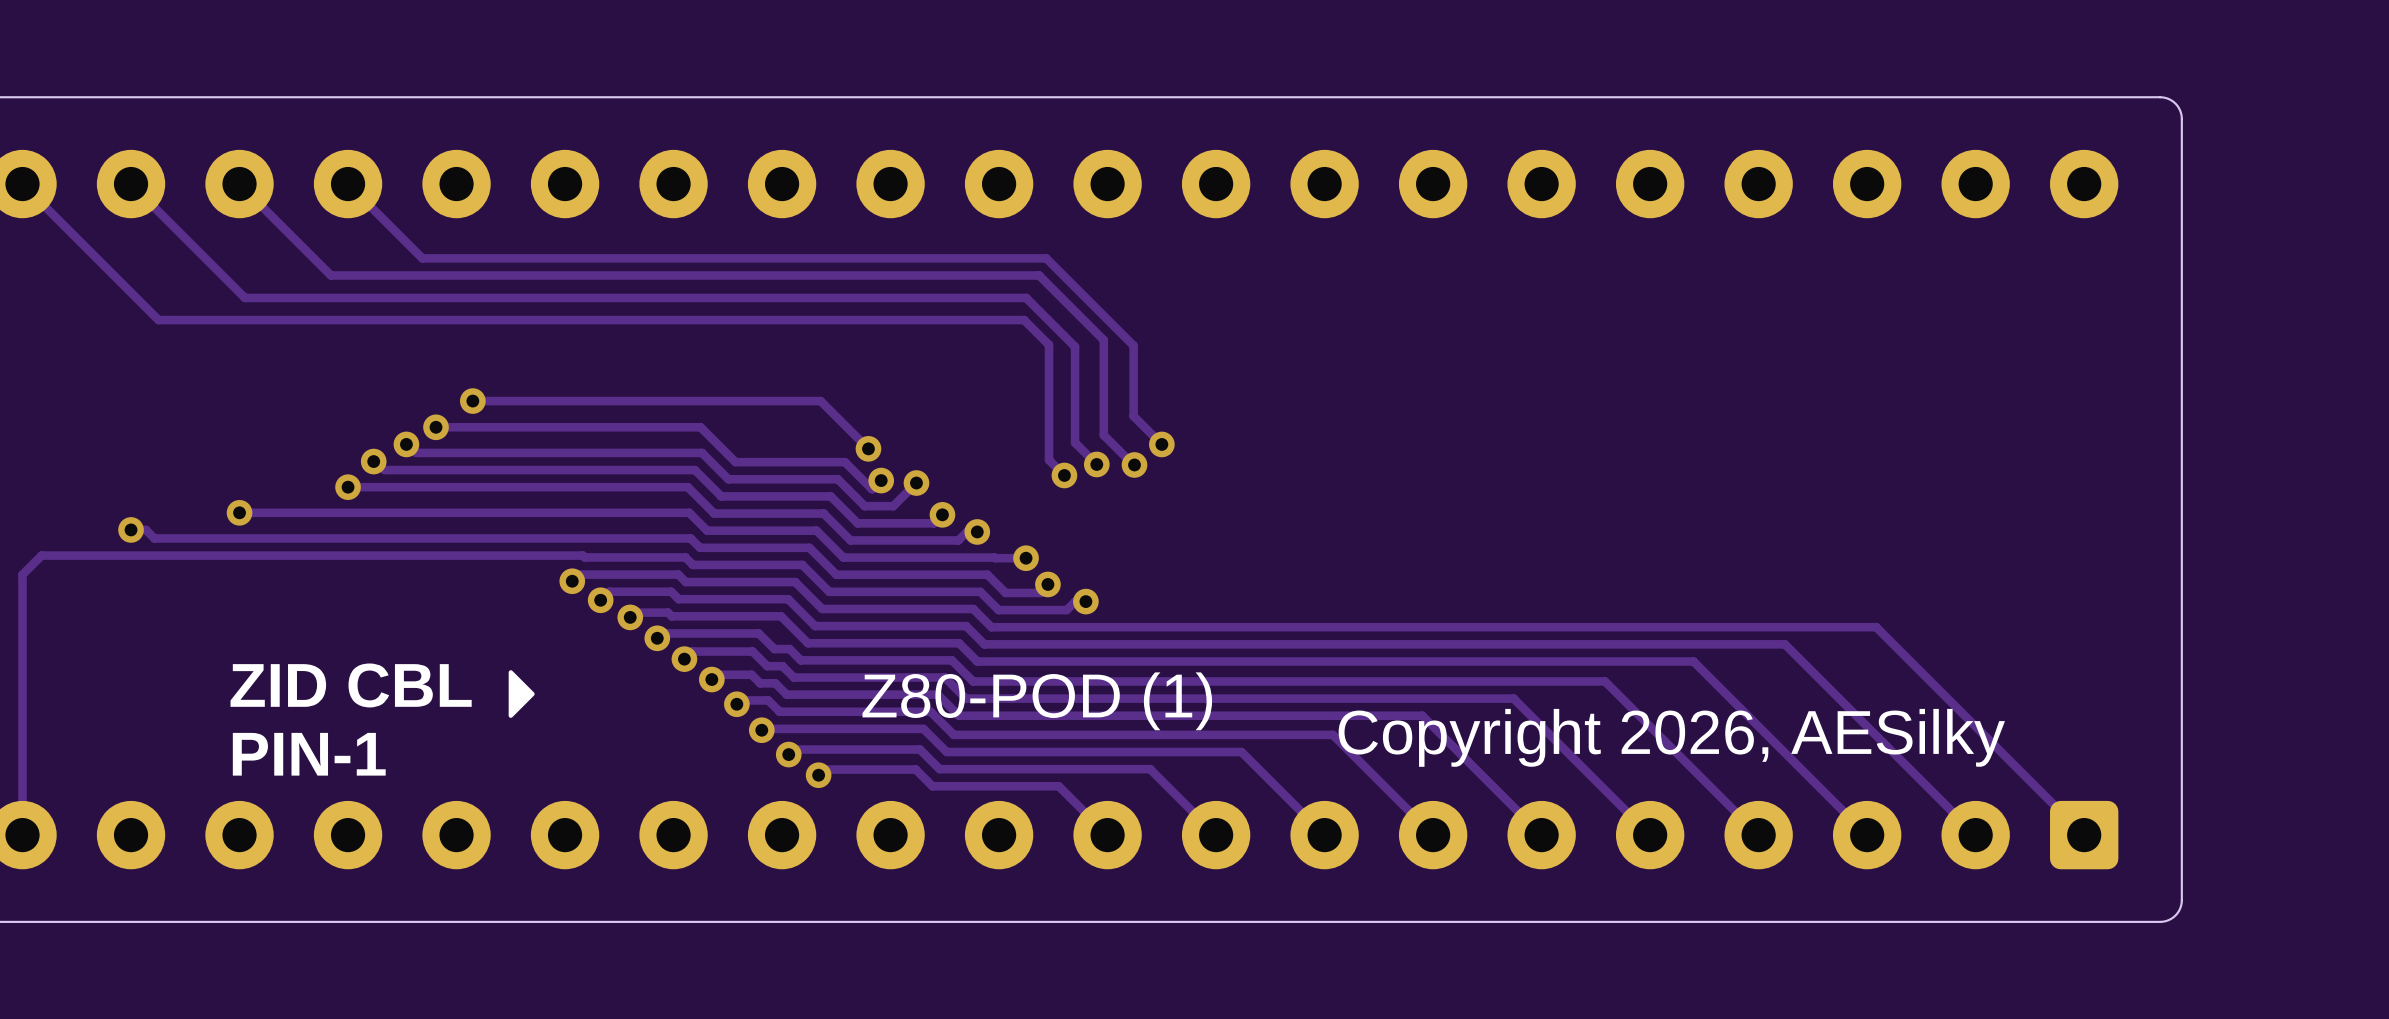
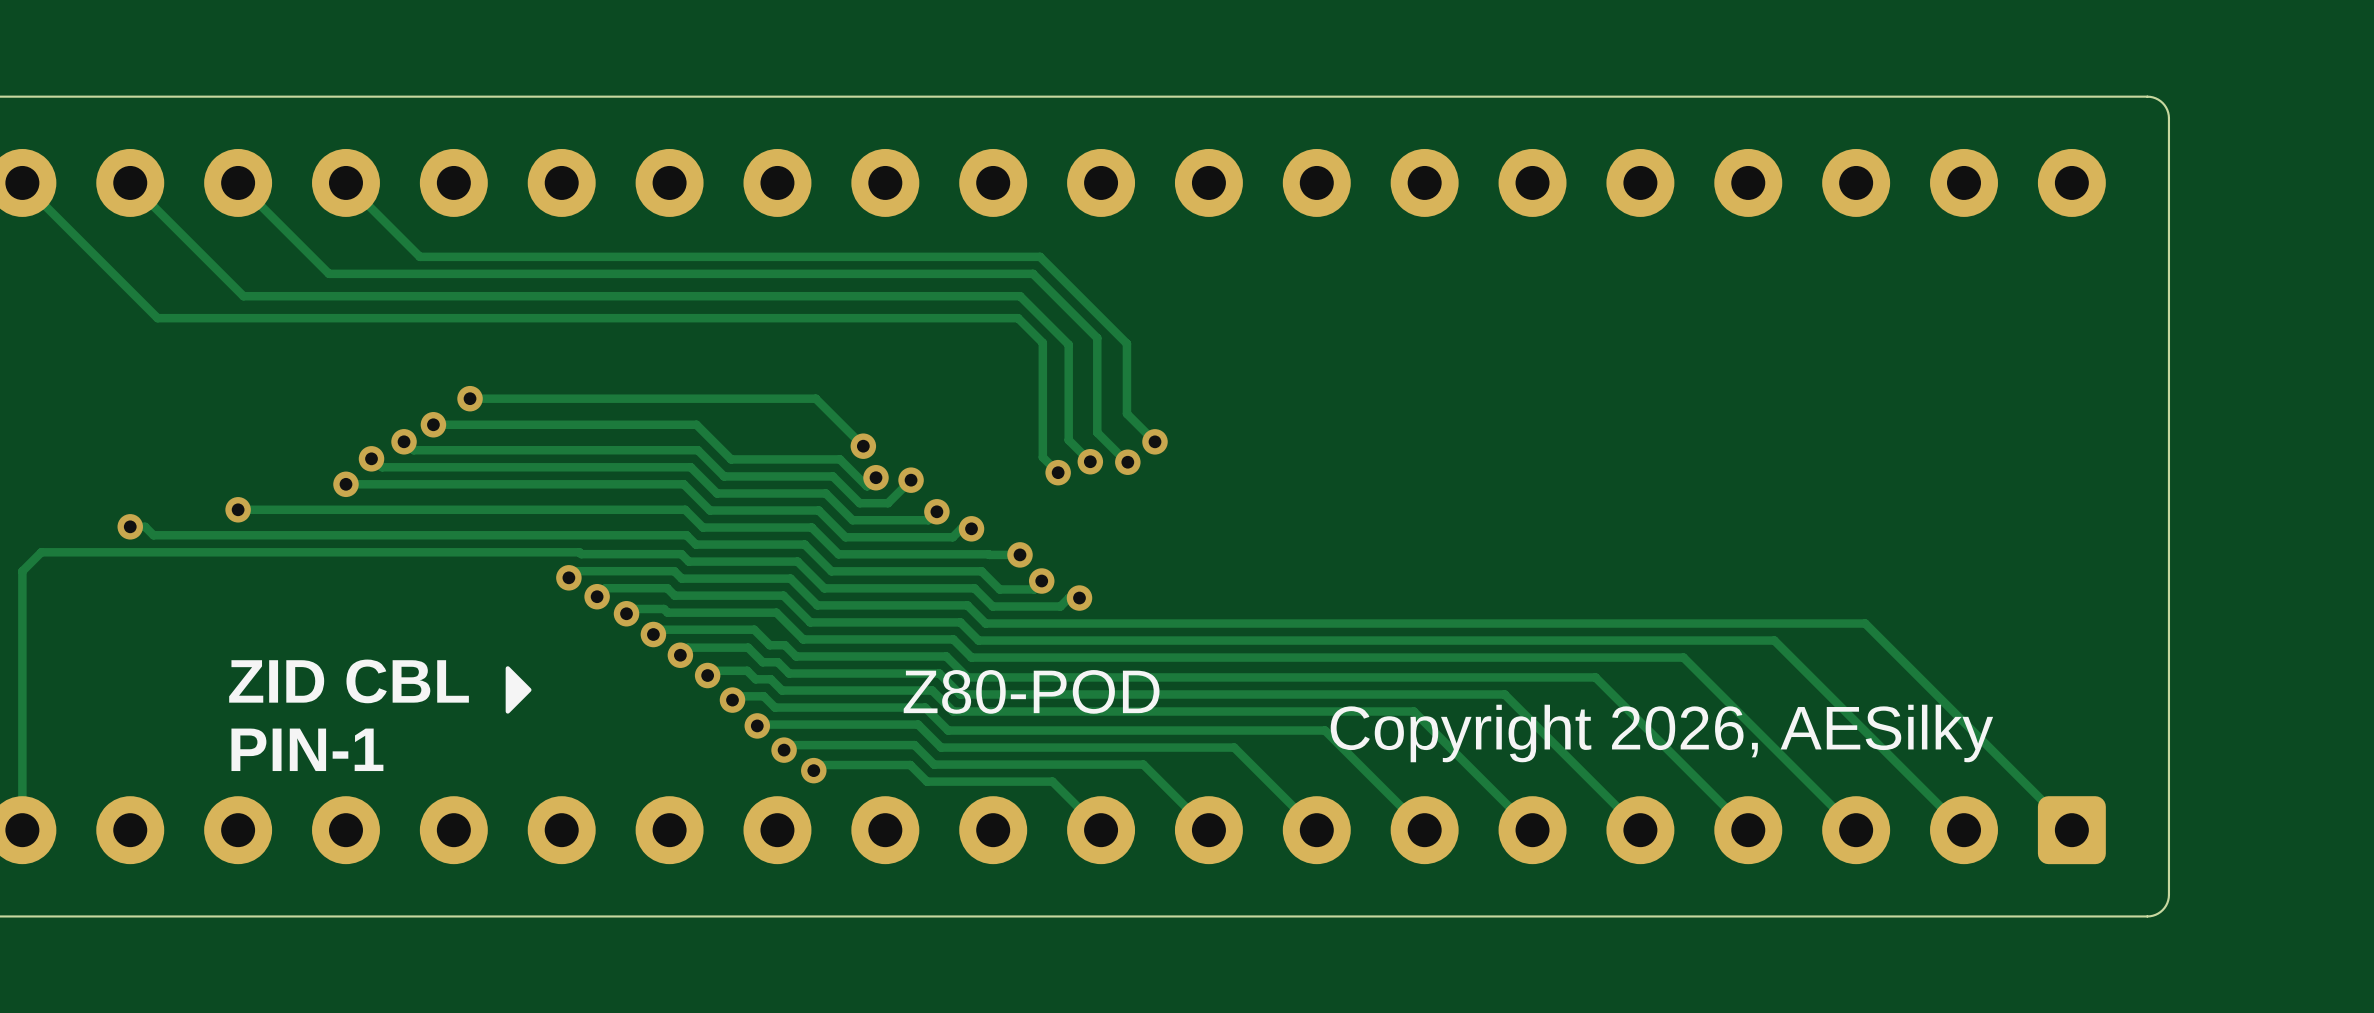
part value: Z80-POD (1) (1037, 701) -> Z80-POD (1031, 691)

